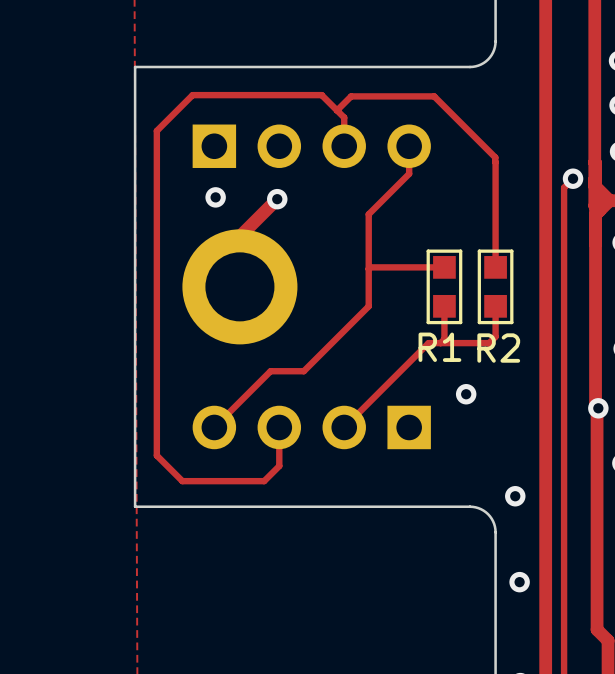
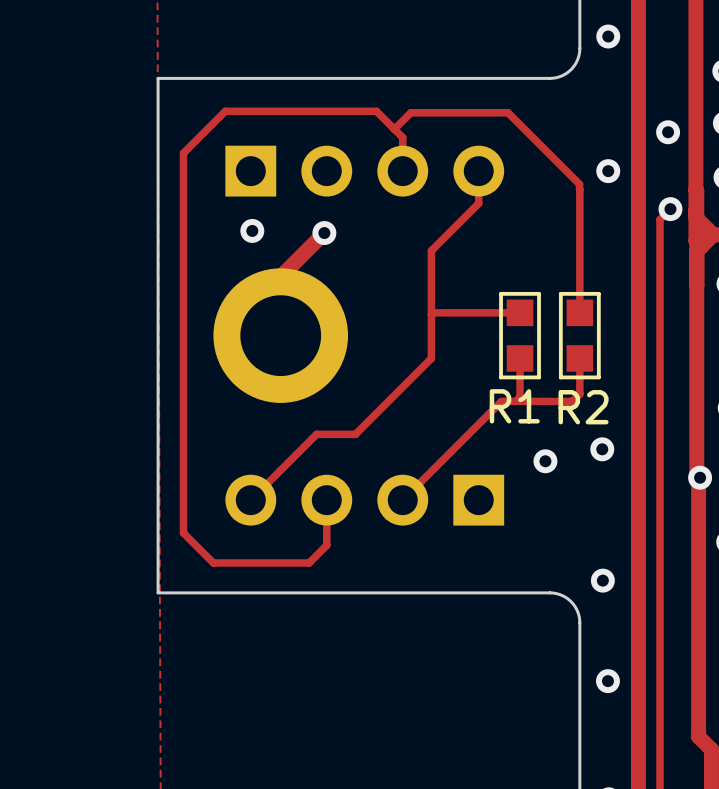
via: none -> (608, 36)
via: none -> (668, 132)
via: none -> (608, 171)
via: none -> (602, 449)

